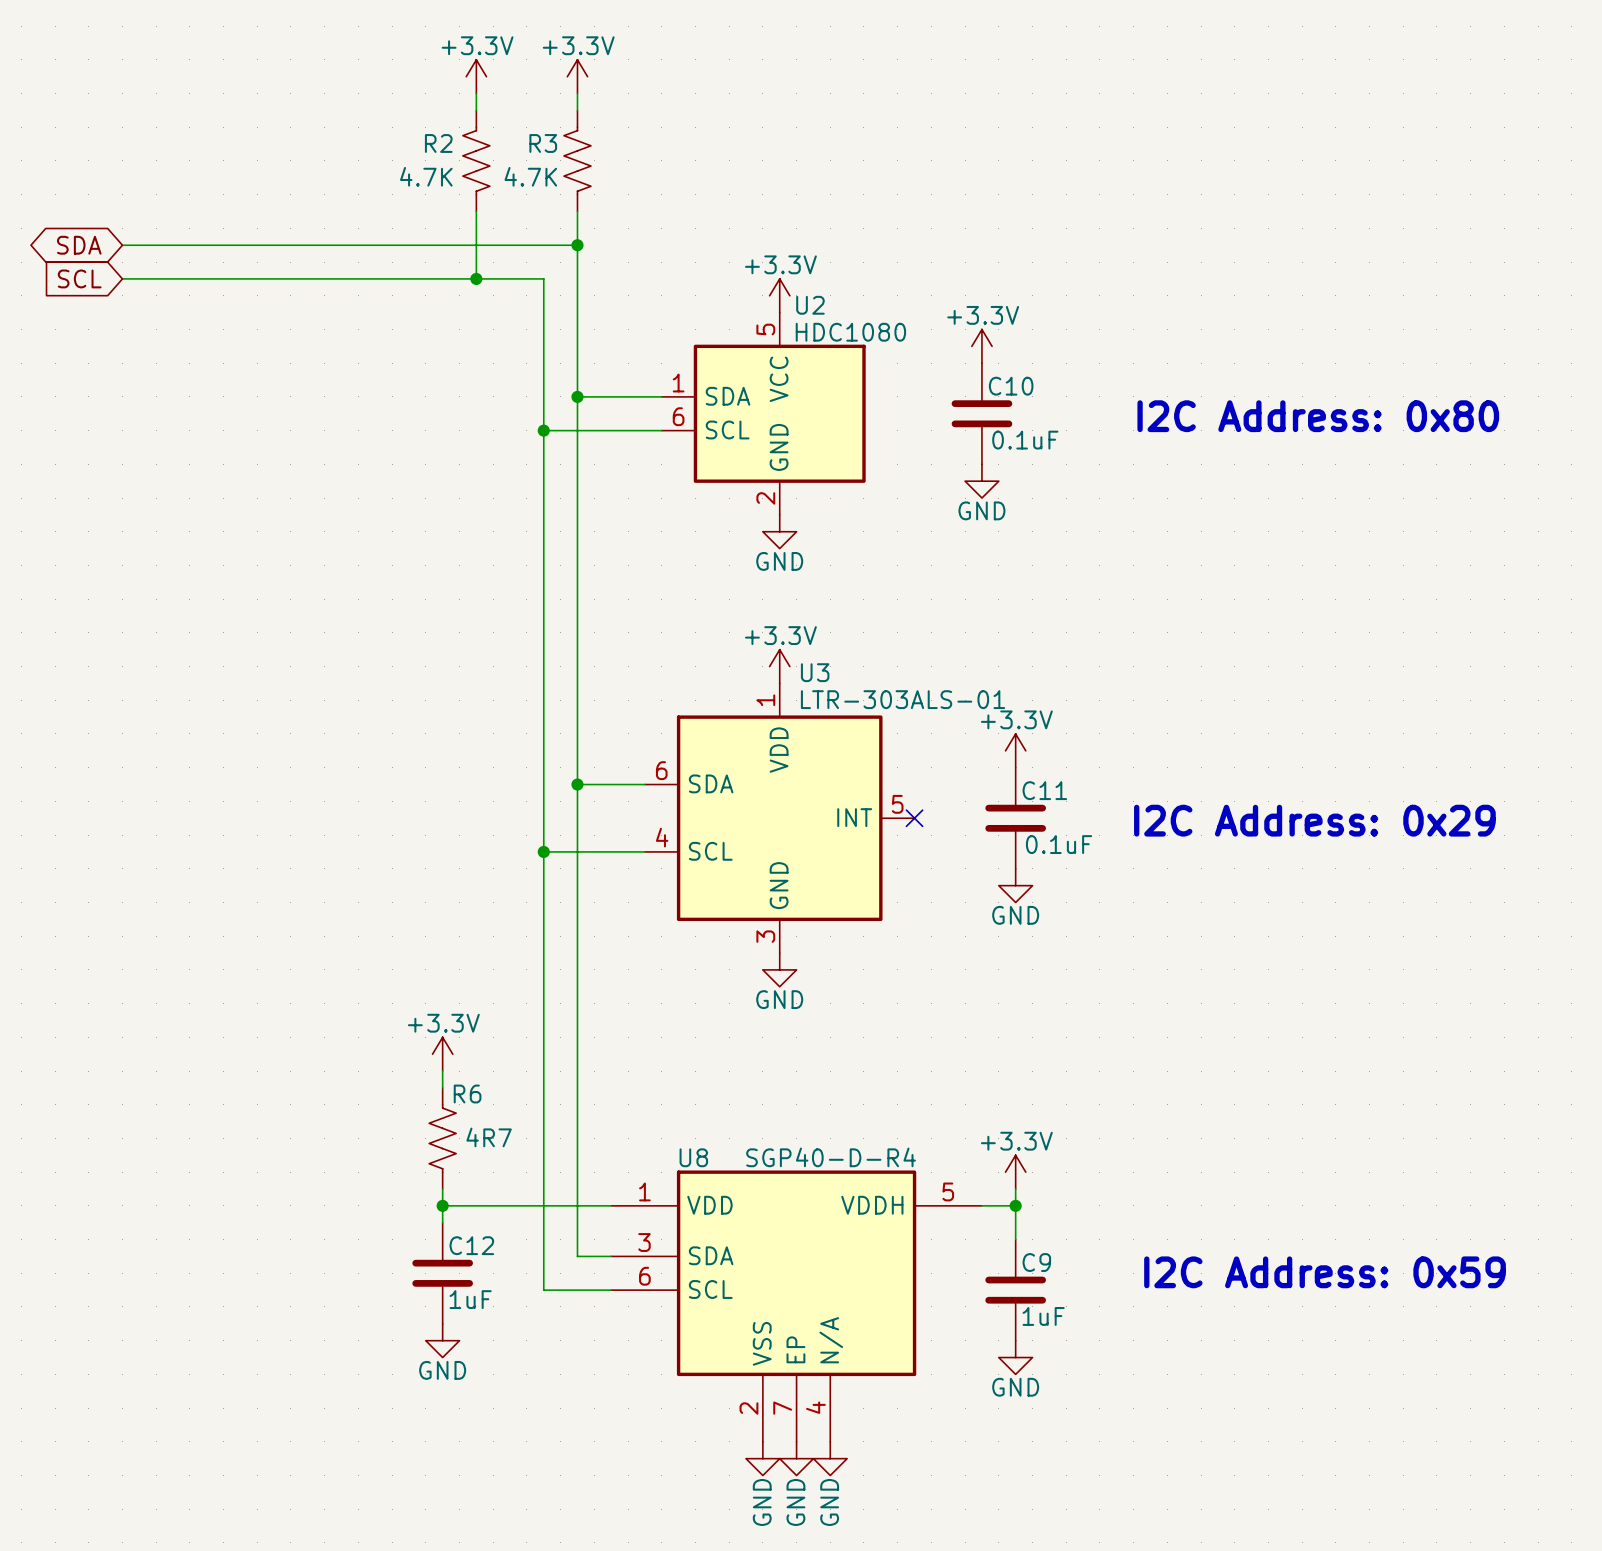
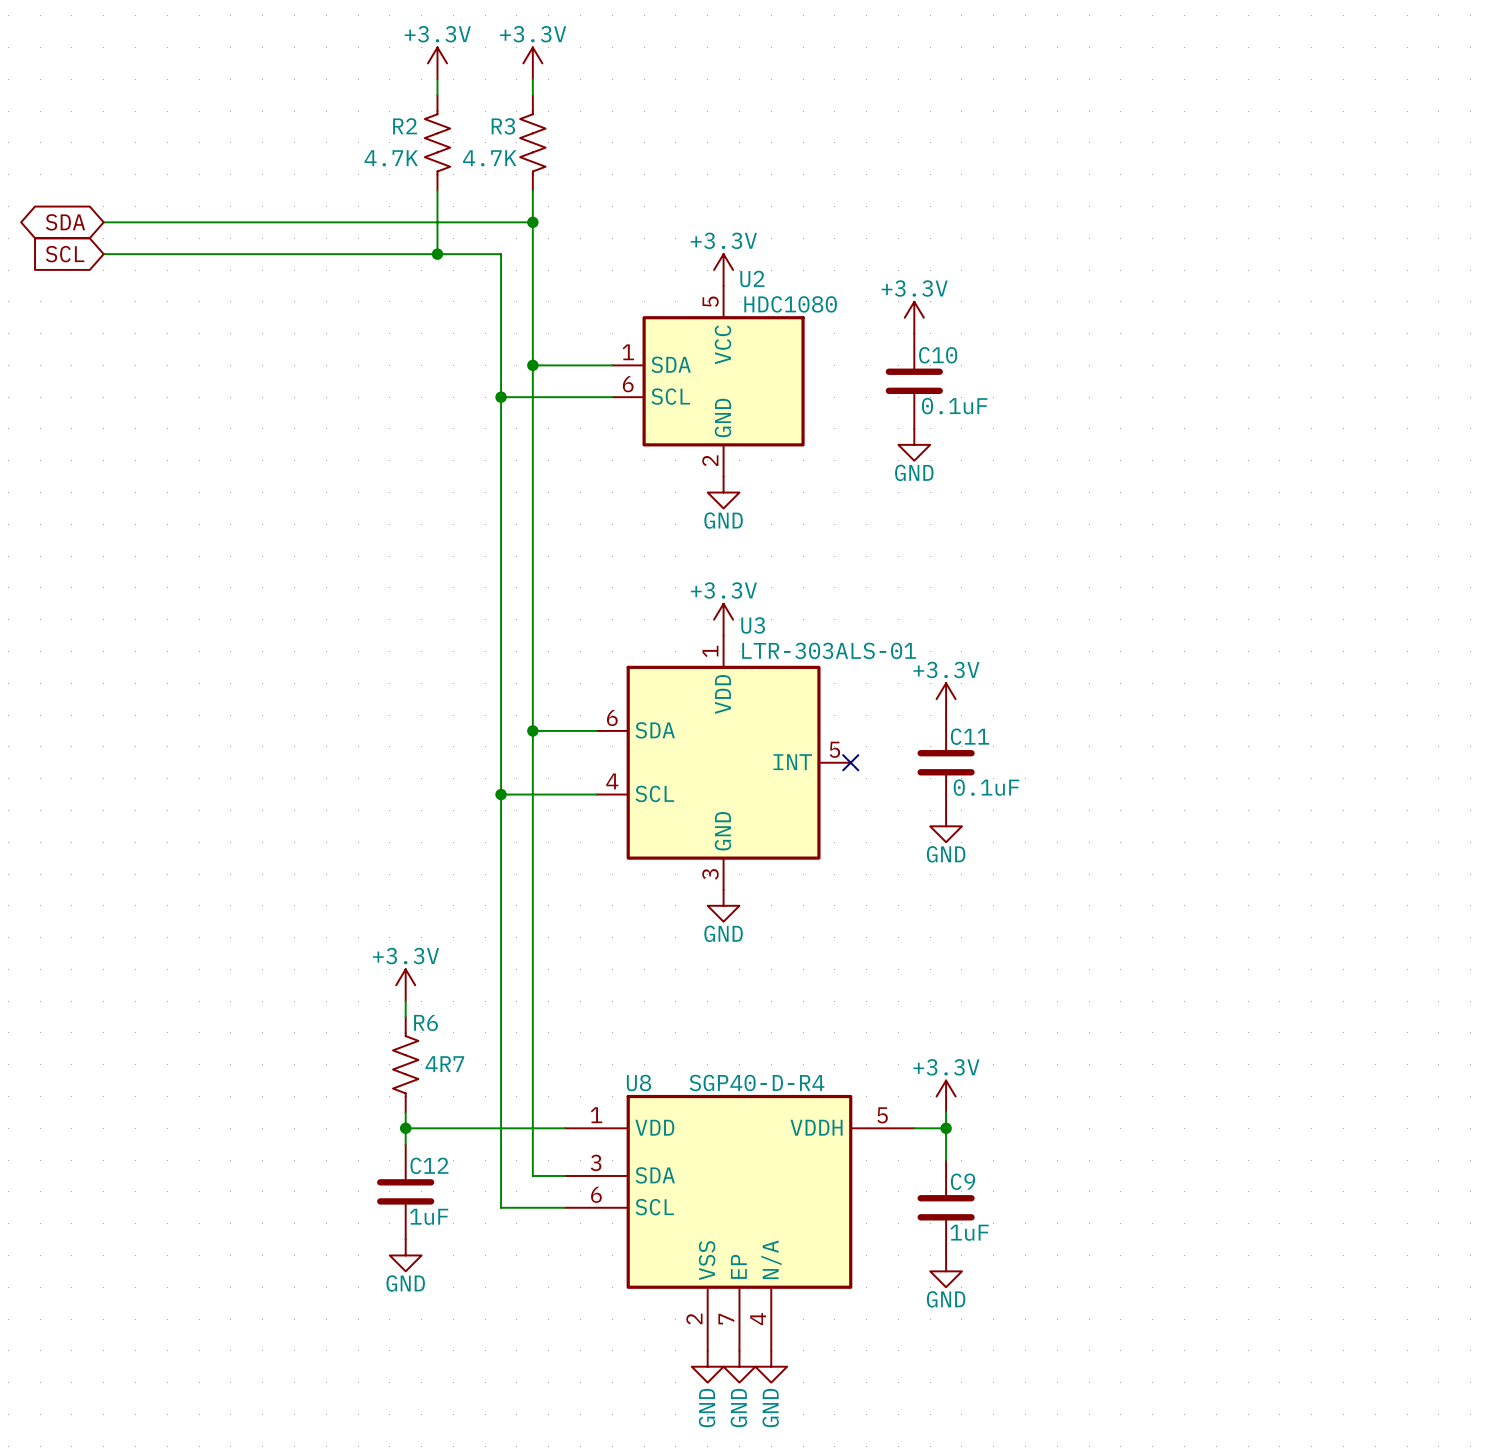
text: I2C Address: 0x80 (1318, 416) -> none
text: I2C Address: 0x29 (1314, 820) -> none
text: I2C Address: 0x59 (1325, 1272) -> none

